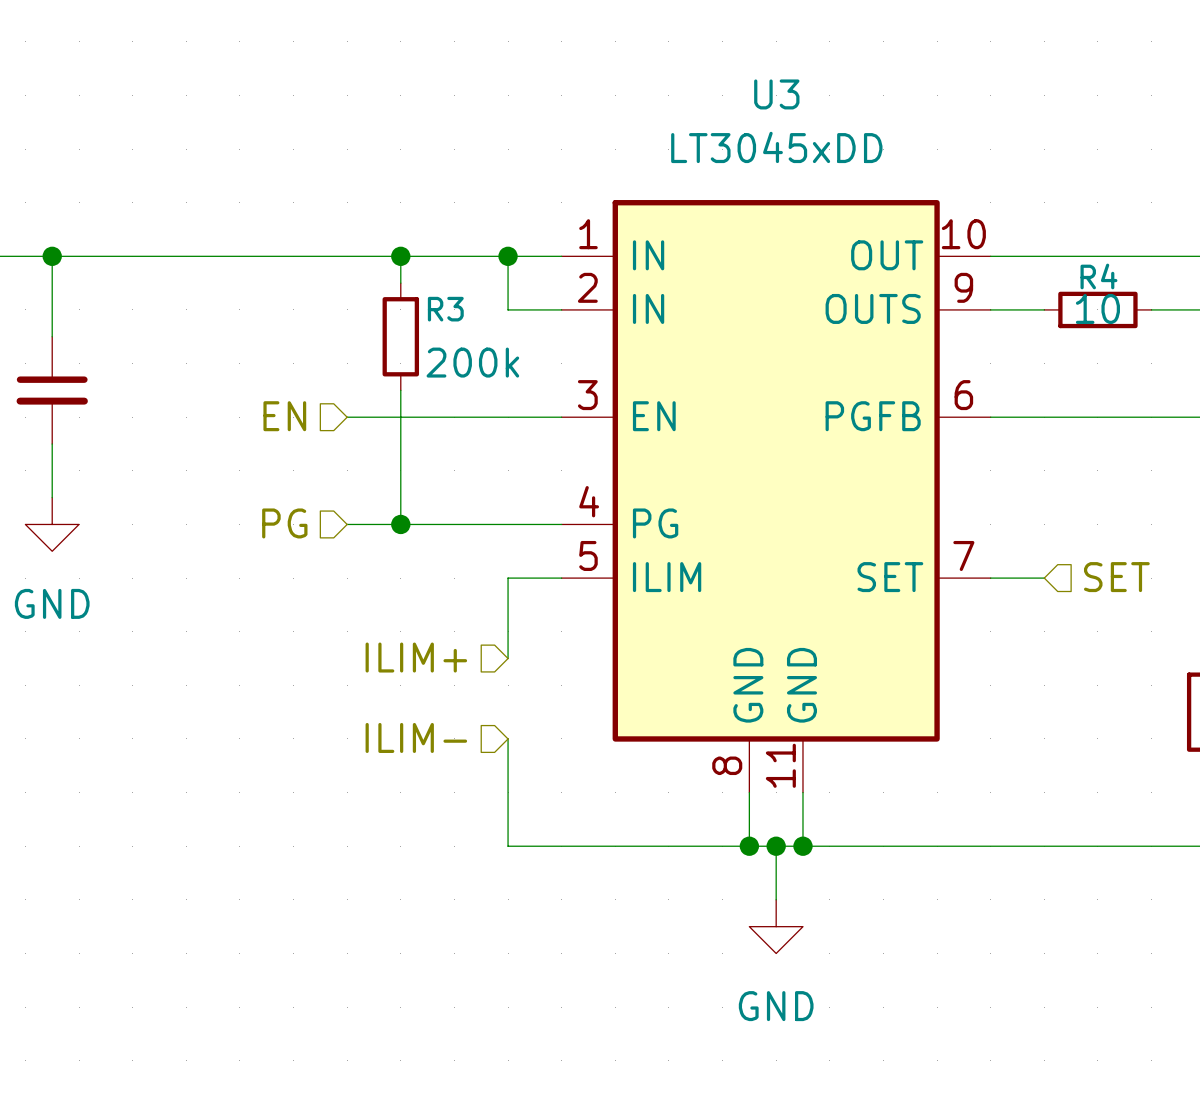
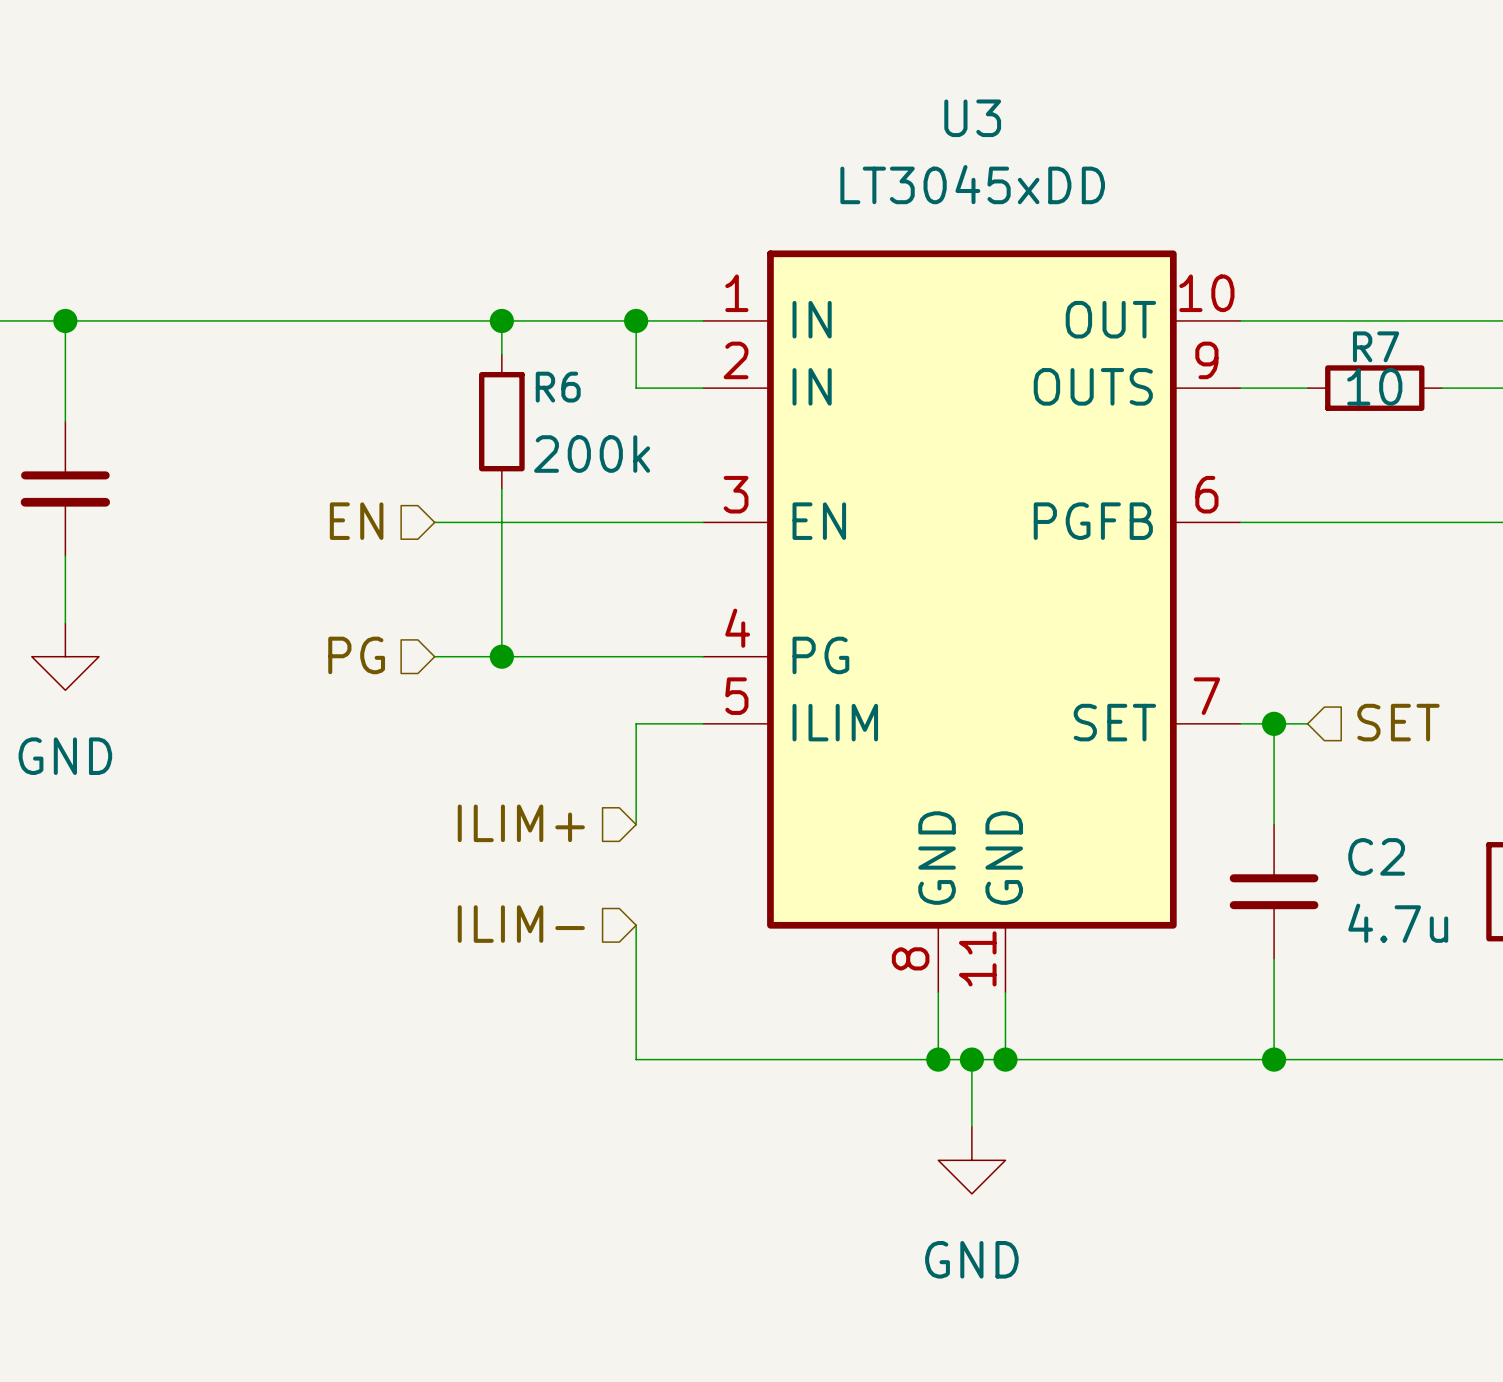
R4 name: R4 (1098, 276) -> R7 (1376, 346)
R3 name: R3 (445, 309) -> R6 (558, 387)
wire: none -> (1274, 723) (1274, 824)
junction: none -> (1274, 723)
C2: none -> 4.7u (1274, 891)
wire: none -> (1274, 958) (1274, 1059)
junction: none -> (1274, 1059)

